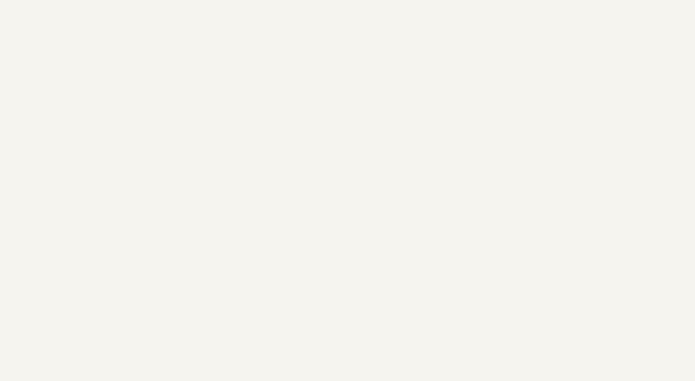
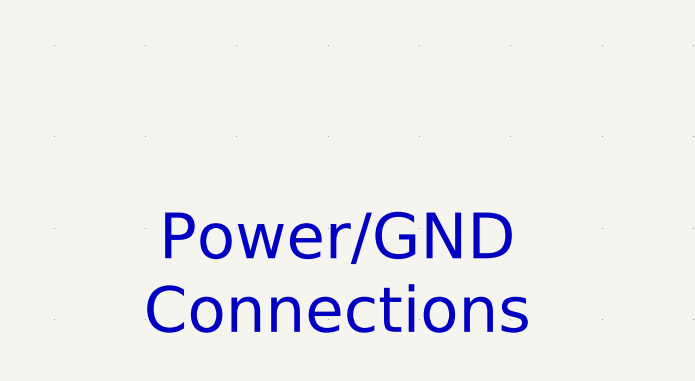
text: none -> Power/GND (338, 237)
text: none -> Connections (337, 308)

